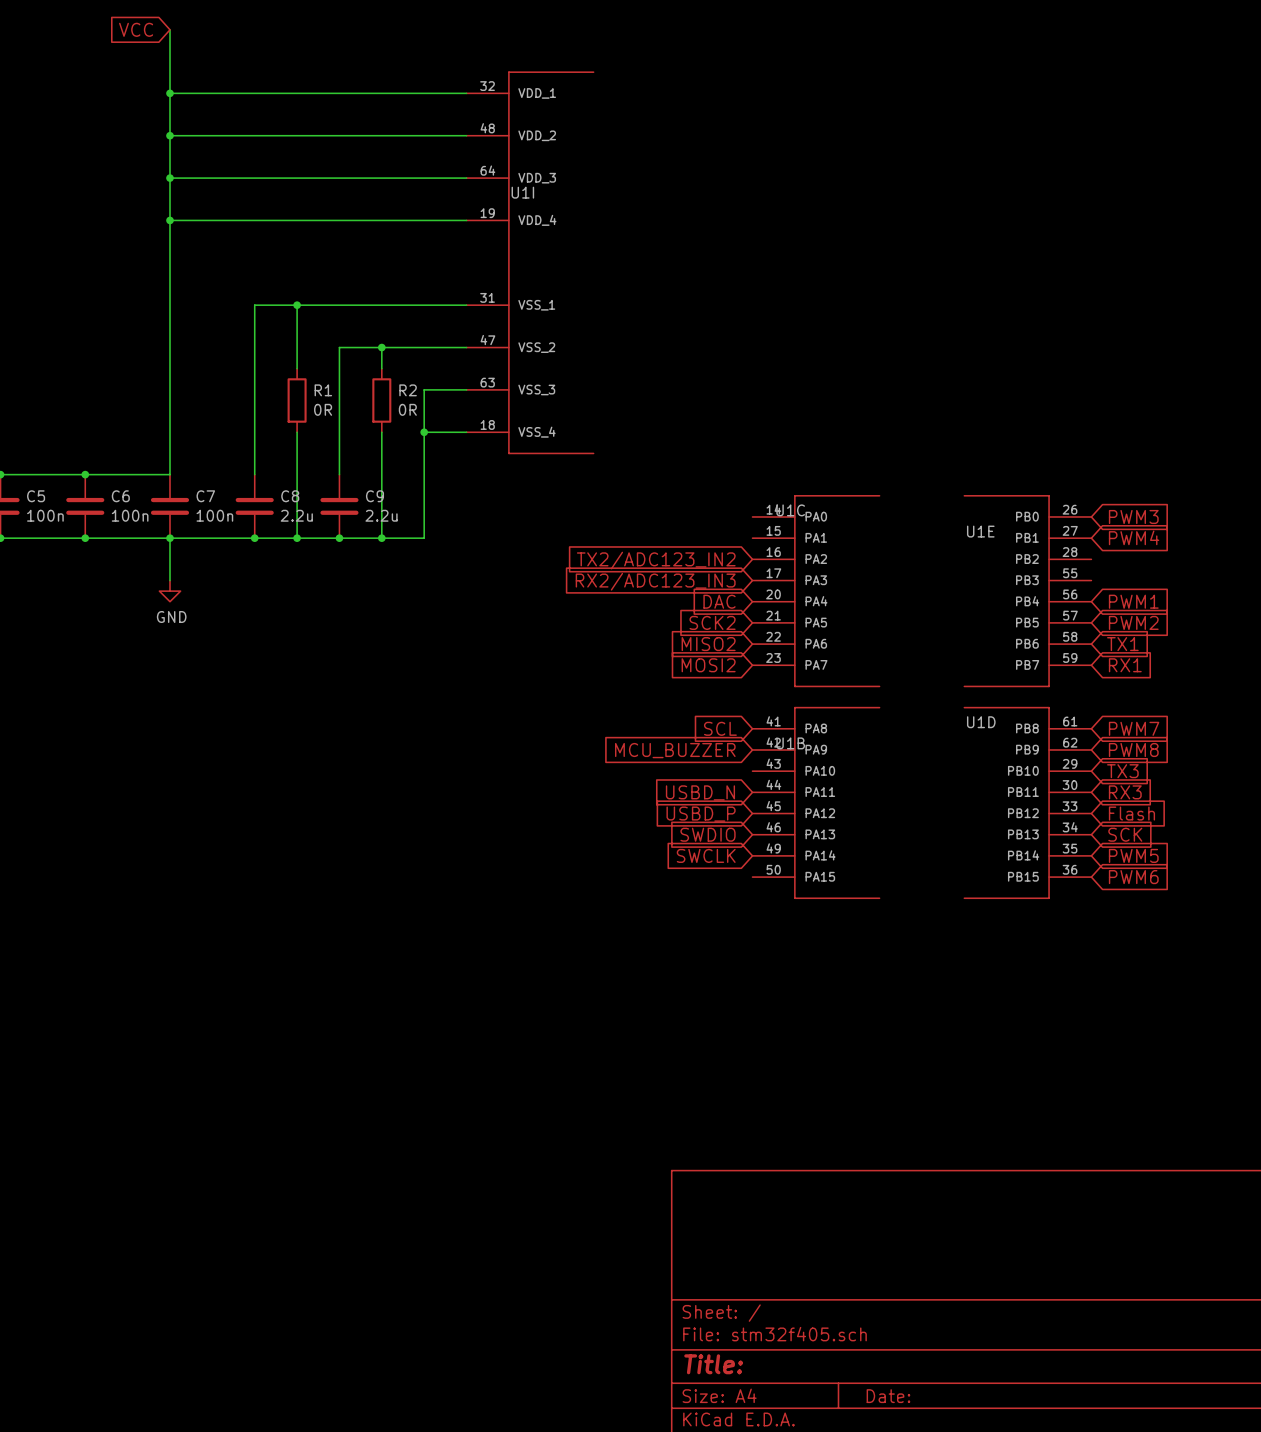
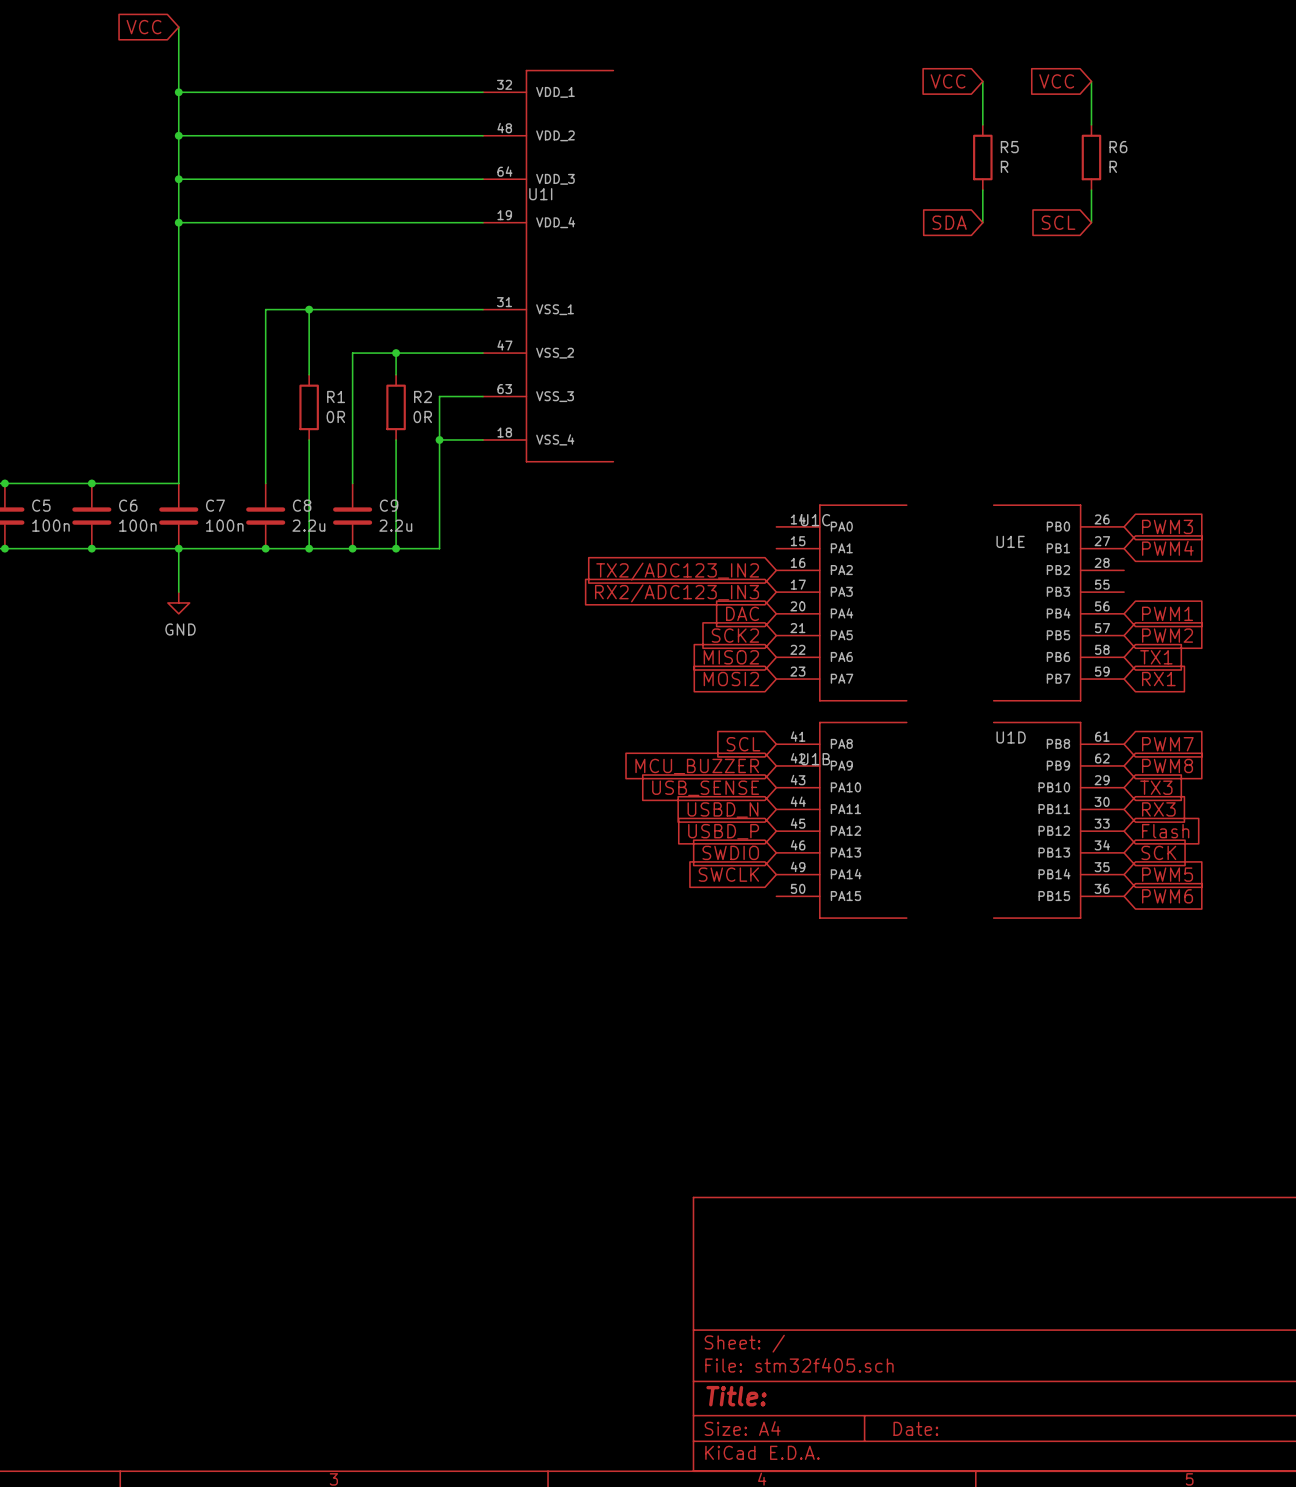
global label: none -> VCC (948, 81)
wire: none -> (982, 81) (982, 124)
global label: none -> VCC (1056, 81)
wire: none -> (1091, 81) (1091, 124)
R5: none -> R (982, 157)
R6: none -> R (1091, 157)
wire: none -> (982, 190) (982, 222)
wire: none -> (1091, 190) (1091, 222)
global label: none -> SDA (949, 222)
global label: none -> SCL (1058, 222)
global label: none -> USB_SENSE (705, 788)

